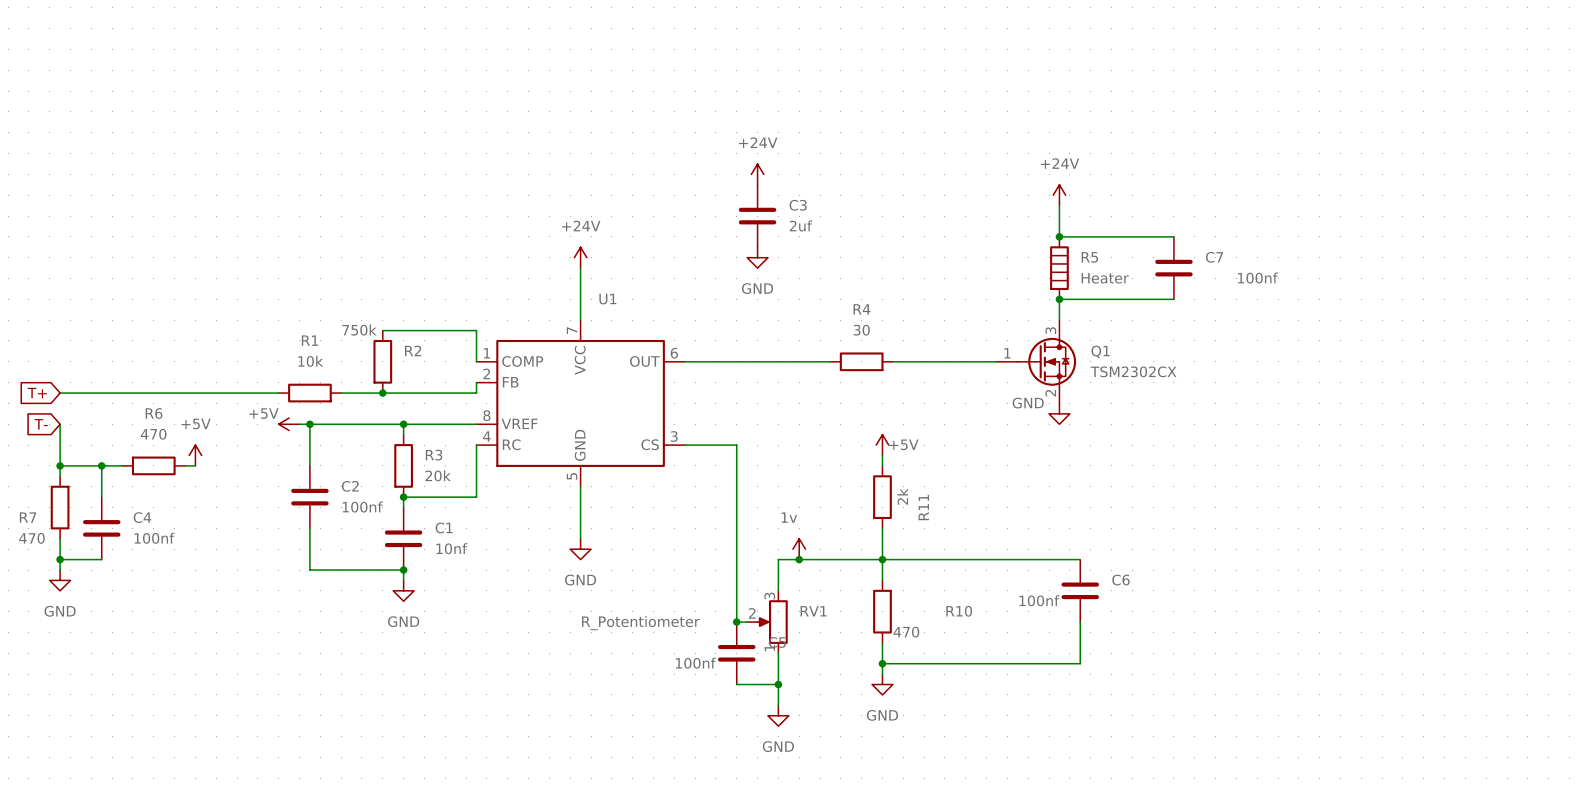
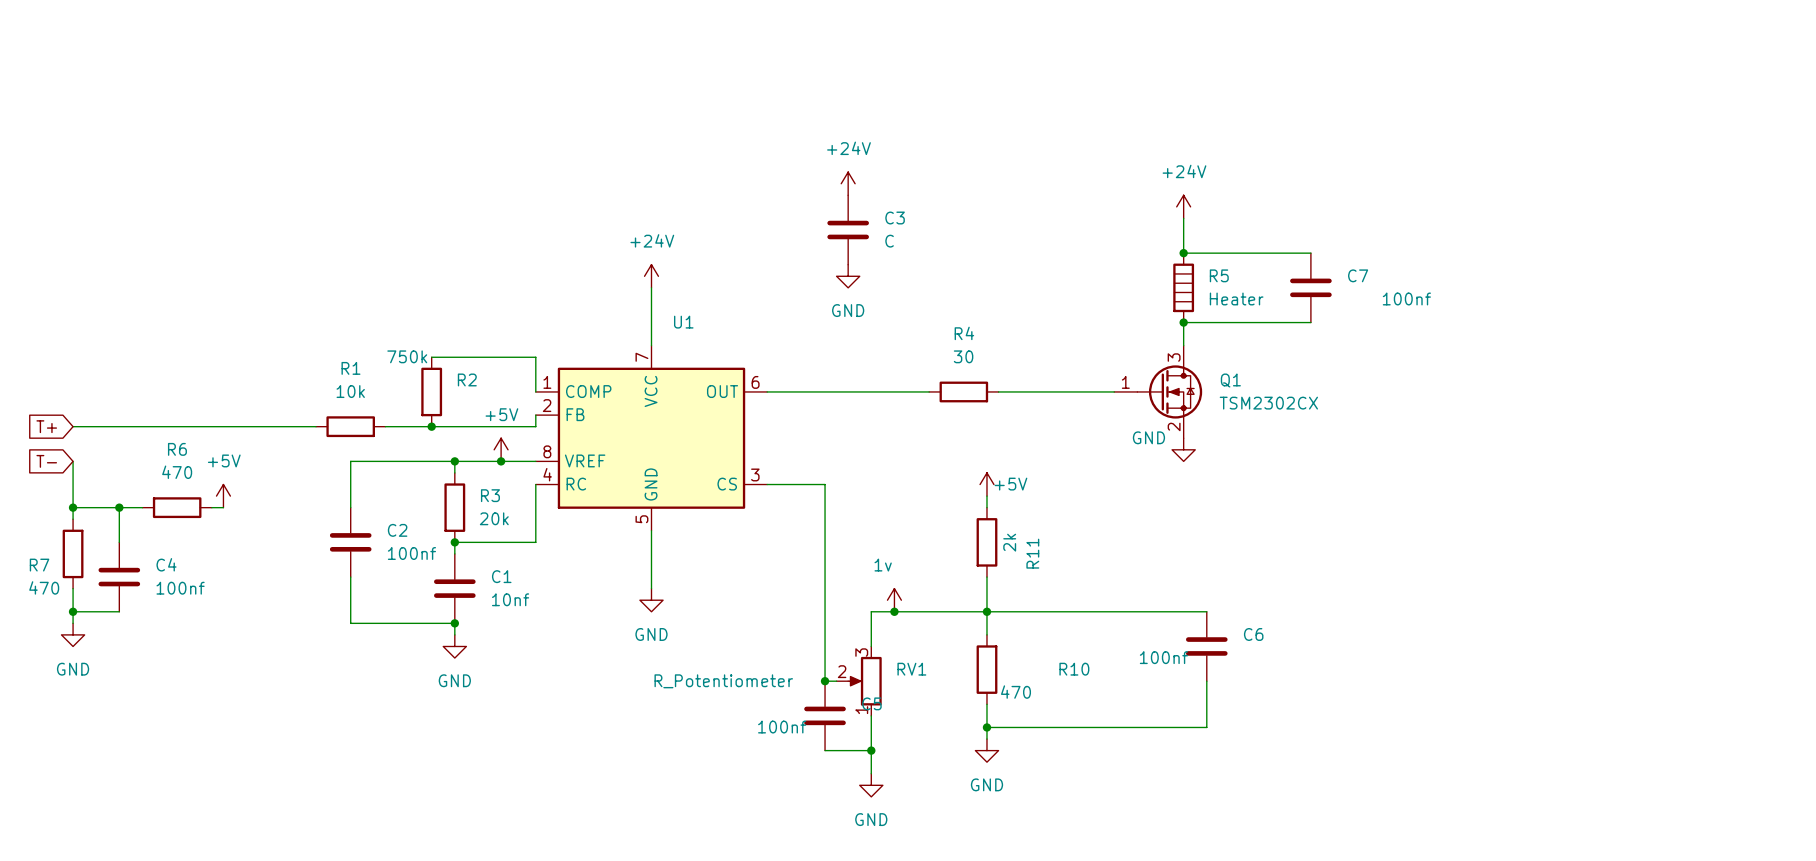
C3 value: 2uf (801, 225) -> C (889, 241)
power symbol rotation: 0° (289, 424) -> 90° clockwise (501, 449)
power symbol position: +5V (289, 424) -> +5V (501, 449)
wire: (299, 424) (309, 424) -> none
junction: (309, 424) -> none
junction: none -> (501, 461)

